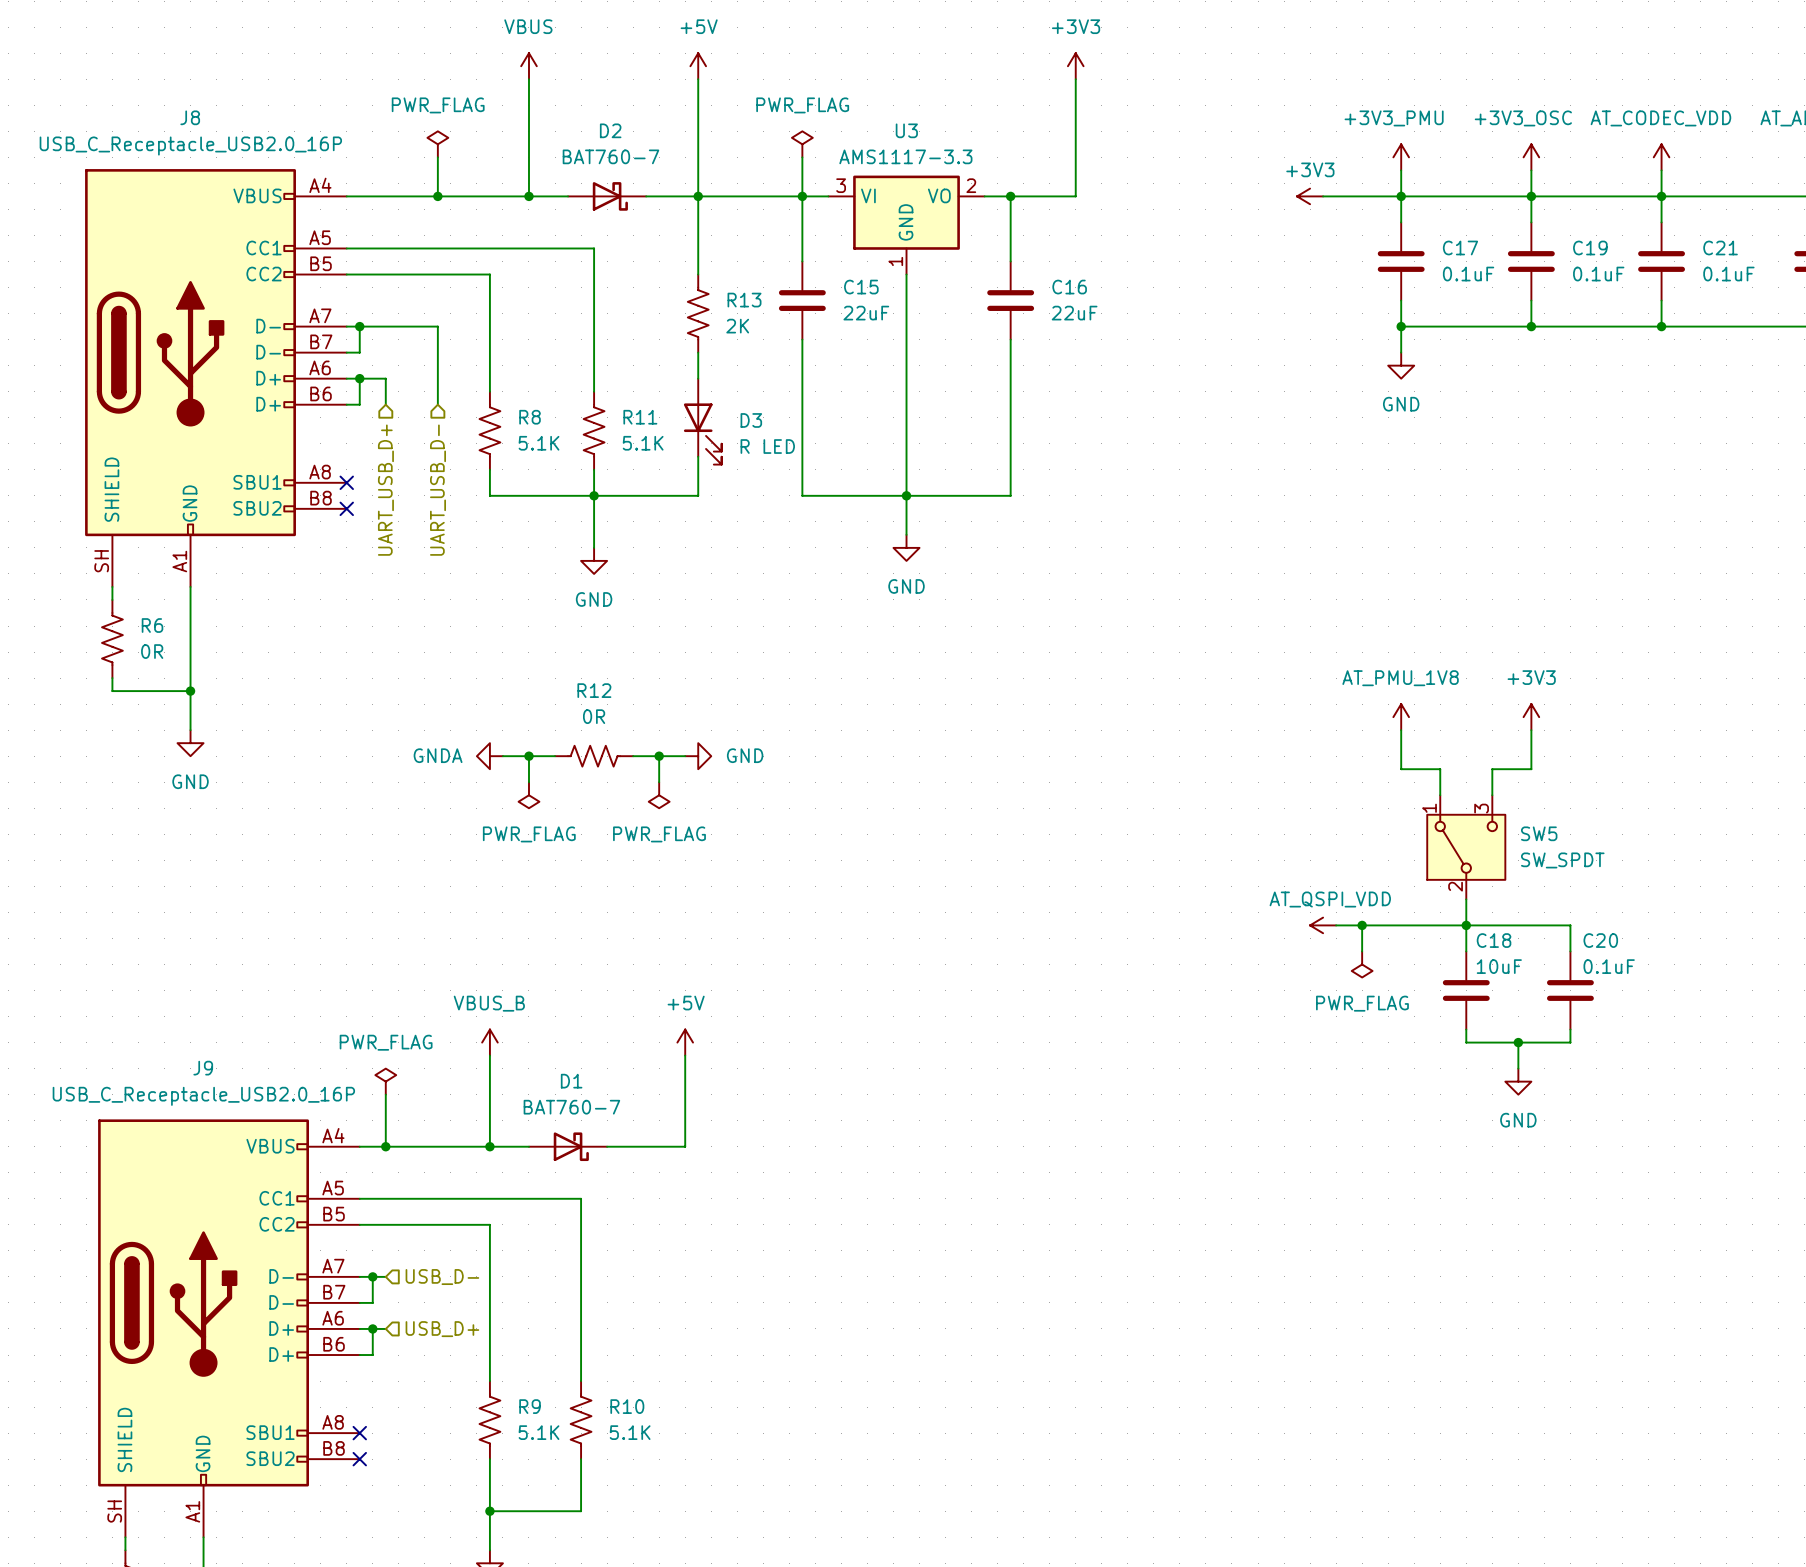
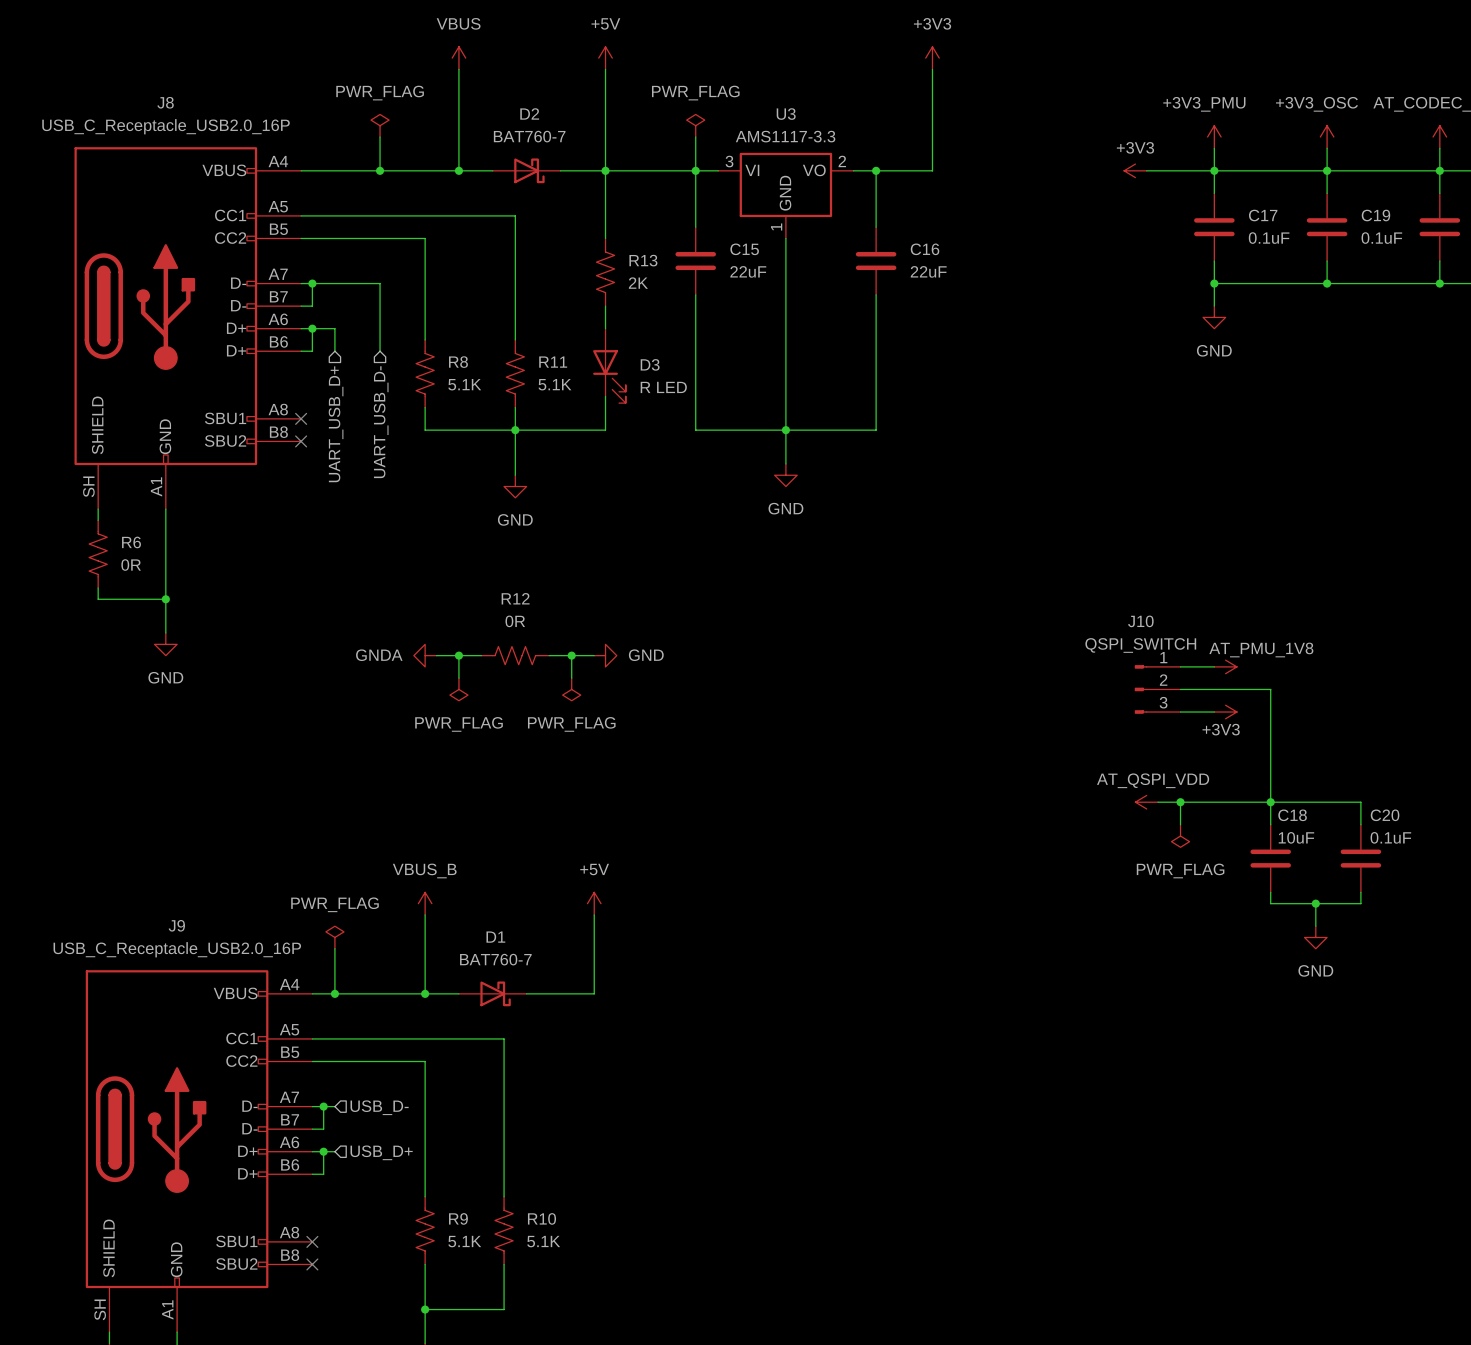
power symbol text position: +3V3 (1531, 677) -> +3V3 (1221, 729)
power symbol text position: AT_PMU_1V8 (1400, 678) -> AT_PMU_1V8 (1261, 649)
power symbol rotation: 0° (1401, 717) -> 90° clockwise (1225, 666)
power symbol position: AT_PMU_1V8 (1401, 717) -> AT_PMU_1V8 (1225, 666)
power symbol rotation: 0° (1531, 717) -> 90° clockwise (1225, 712)
power symbol position: +3V3 (1531, 717) -> +3V3 (1225, 712)
wire: (1401, 730) (1401, 769) (1440, 769) (1440, 795) -> none
wire: (1531, 730) (1531, 769) (1492, 769) (1492, 795) -> none
wire: none -> (1180, 666) (1214, 666)
J10: none -> QSPI_SWITCH (1157, 689)
wire: none -> (1180, 689) (1270, 689) (1270, 779)
wire: none -> (1180, 712) (1214, 712)
SW5: SW_SPDT (1466, 847) -> none

